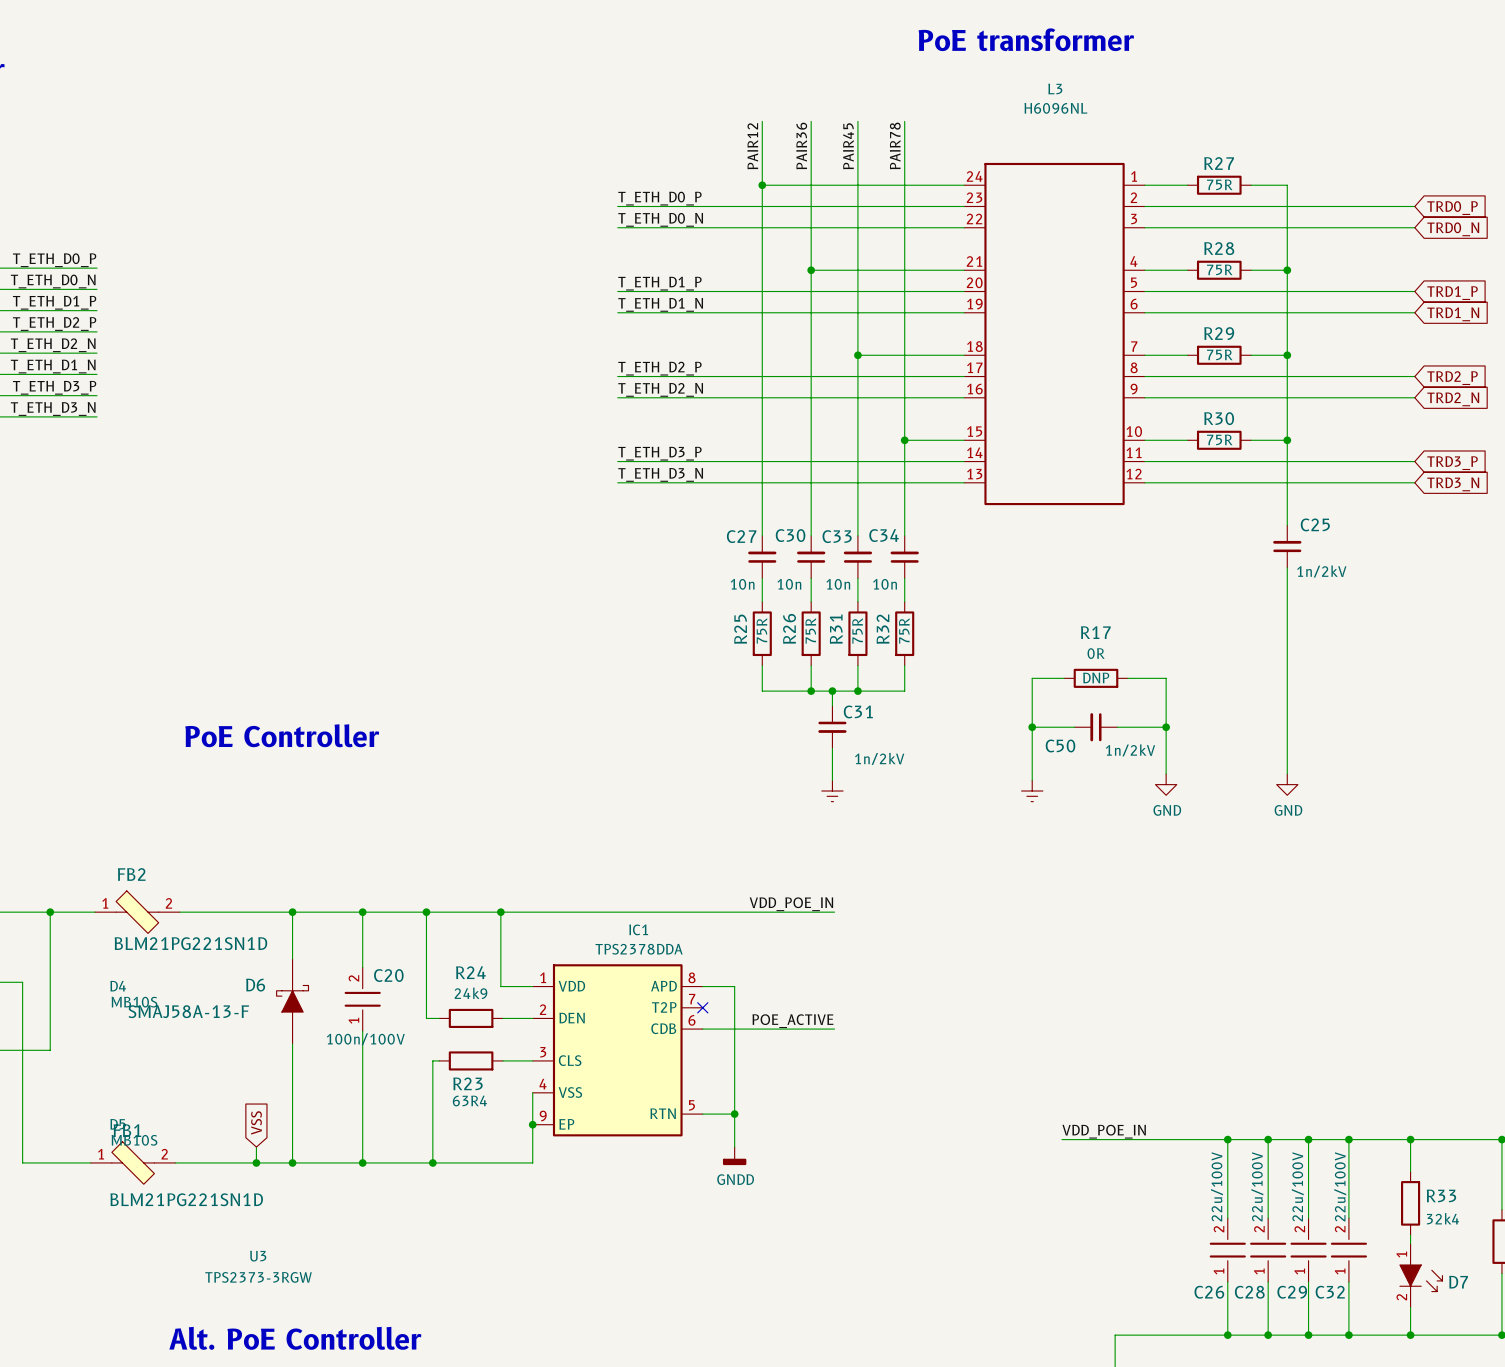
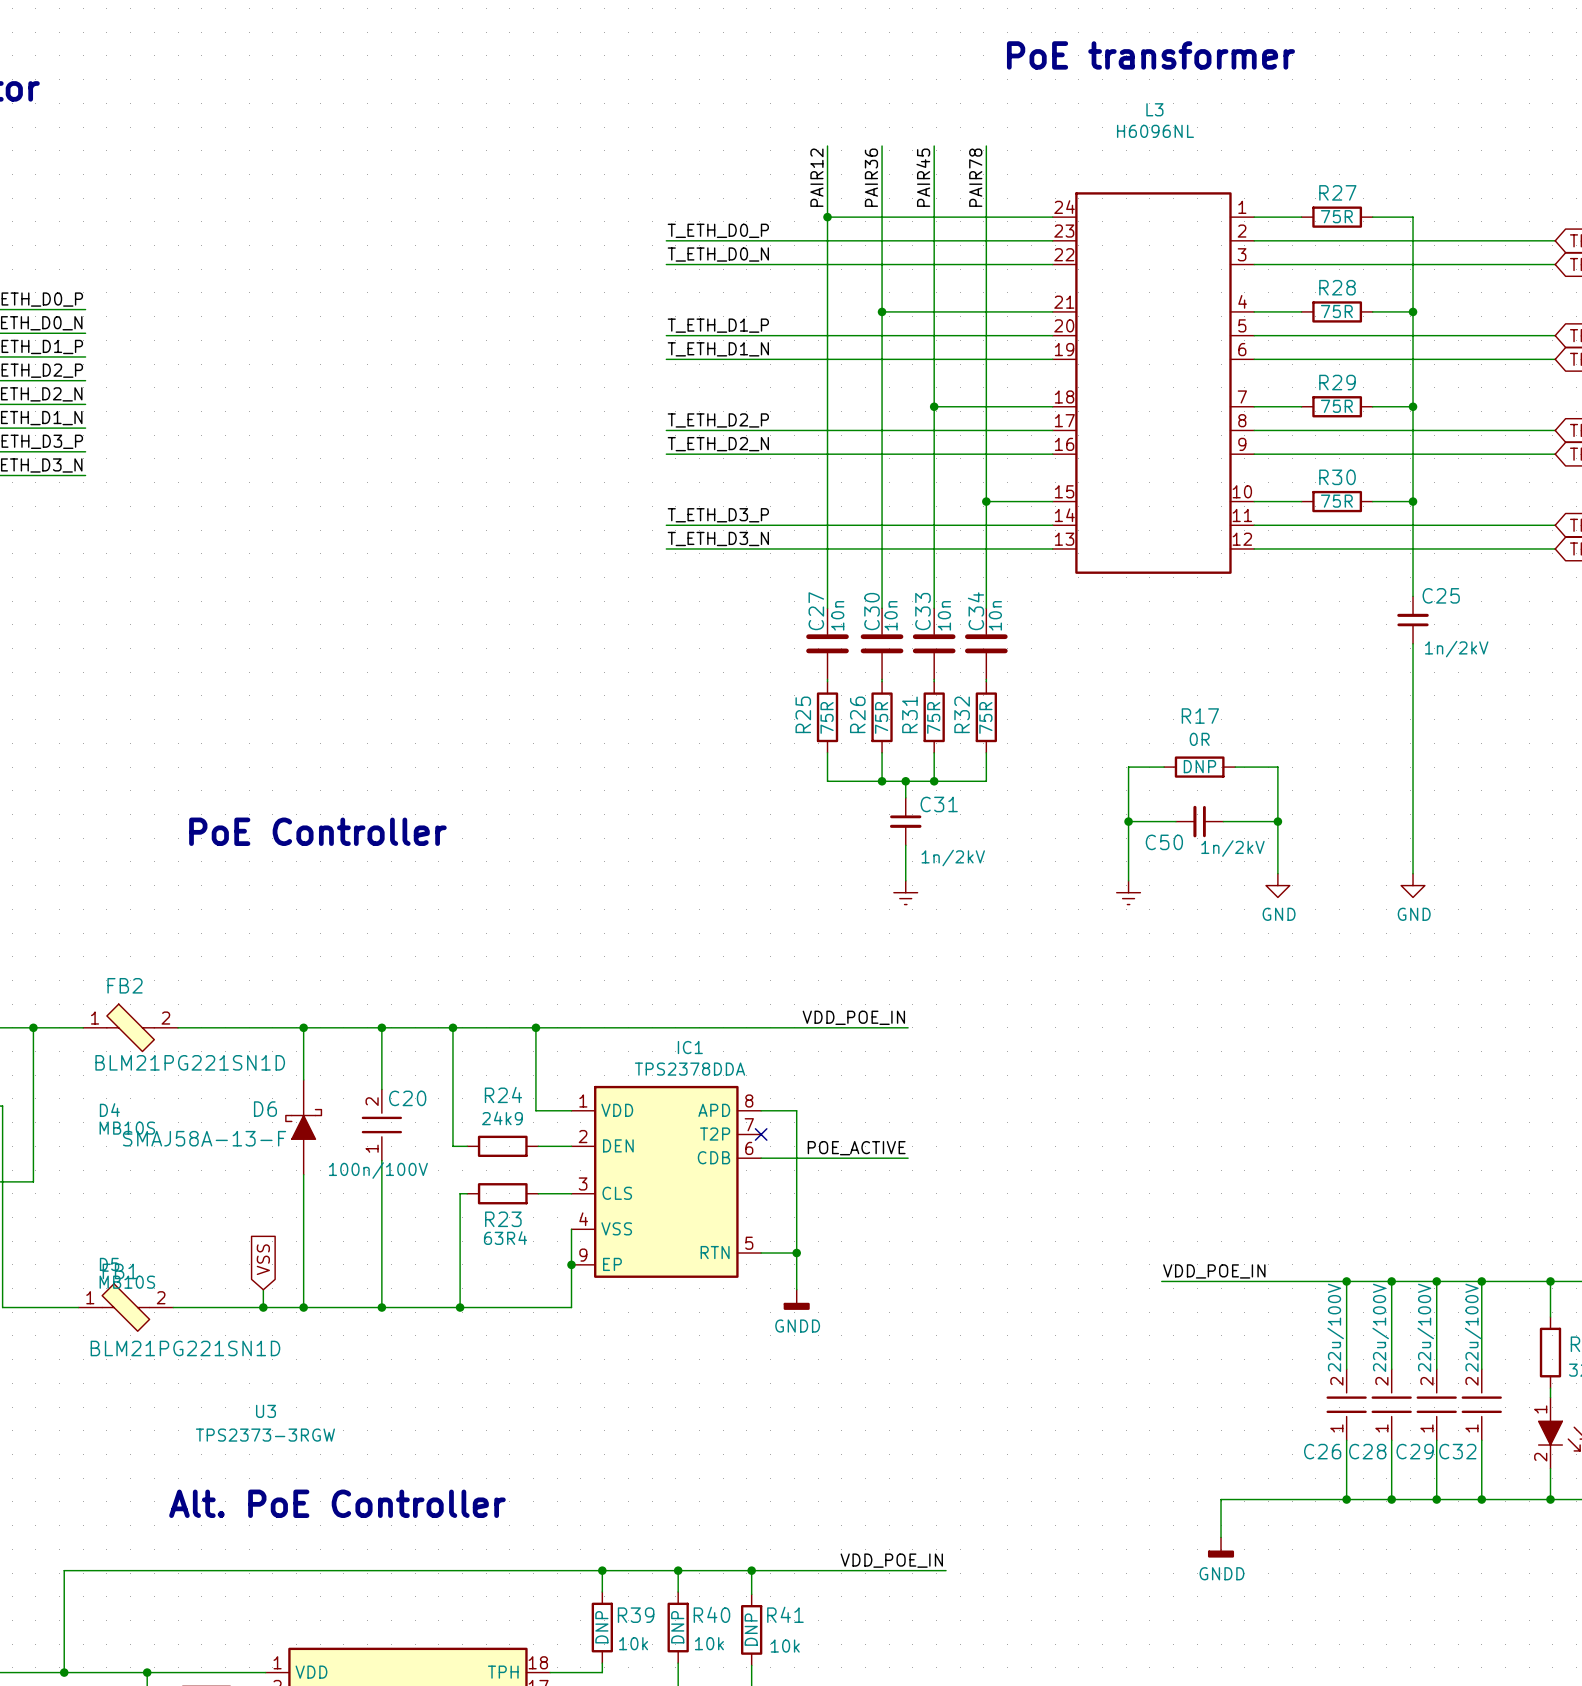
C27 symbol: [748, 535, 777, 579] -> [806, 608, 849, 680]
C30 name position: C30 (790, 535) -> C30 (872, 611)
C30 symbol: [797, 535, 826, 579] -> [860, 608, 904, 680]
C33 symbol: [843, 535, 873, 579] -> [912, 608, 956, 680]
C34 name position: C34 (884, 535) -> C34 (975, 611)
C34 symbol: [890, 535, 919, 579] -> [965, 608, 1008, 680]
C27 name position: C27 (741, 536) -> C27 (816, 611)
C33 name position: C33 (837, 536) -> C33 (922, 611)
C27 text position: 10n (742, 584) -> 10n (837, 615)
C30 text position: 10n (789, 584) -> 10n (891, 615)
C33 text position: 10n (838, 584) -> 10n (944, 615)
C34 text position: 10n (885, 584) -> 10n (995, 615)

